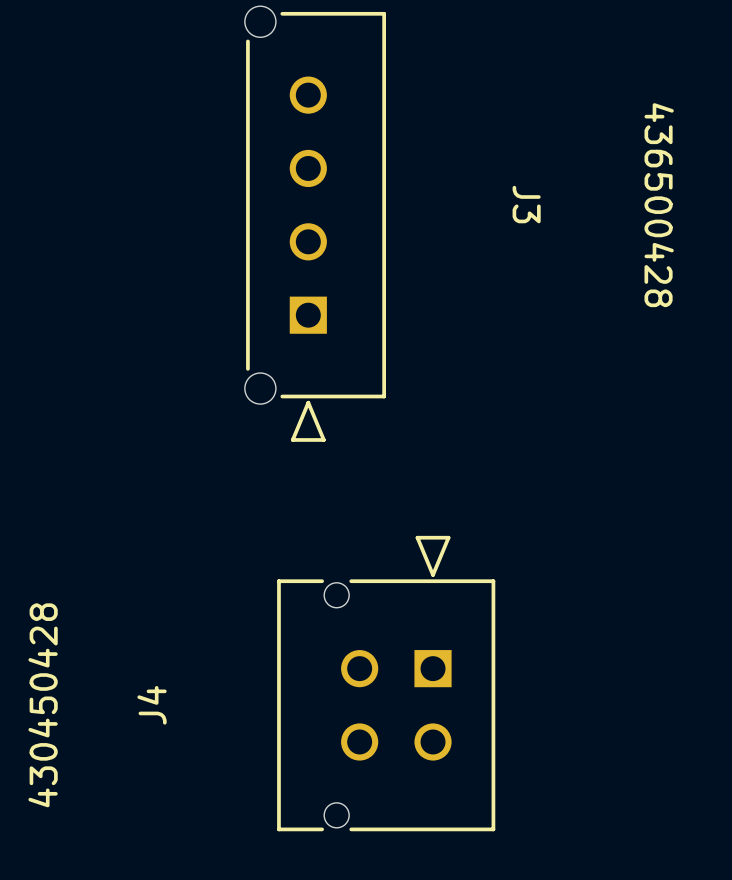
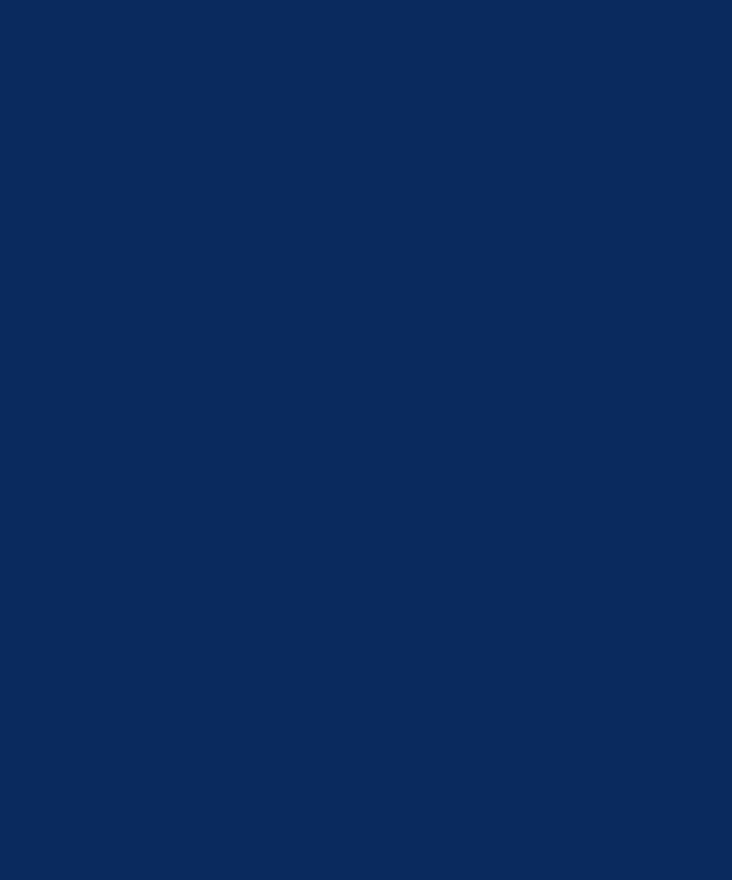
J3: (315, 224) -> none
J4: (386, 683) -> none

